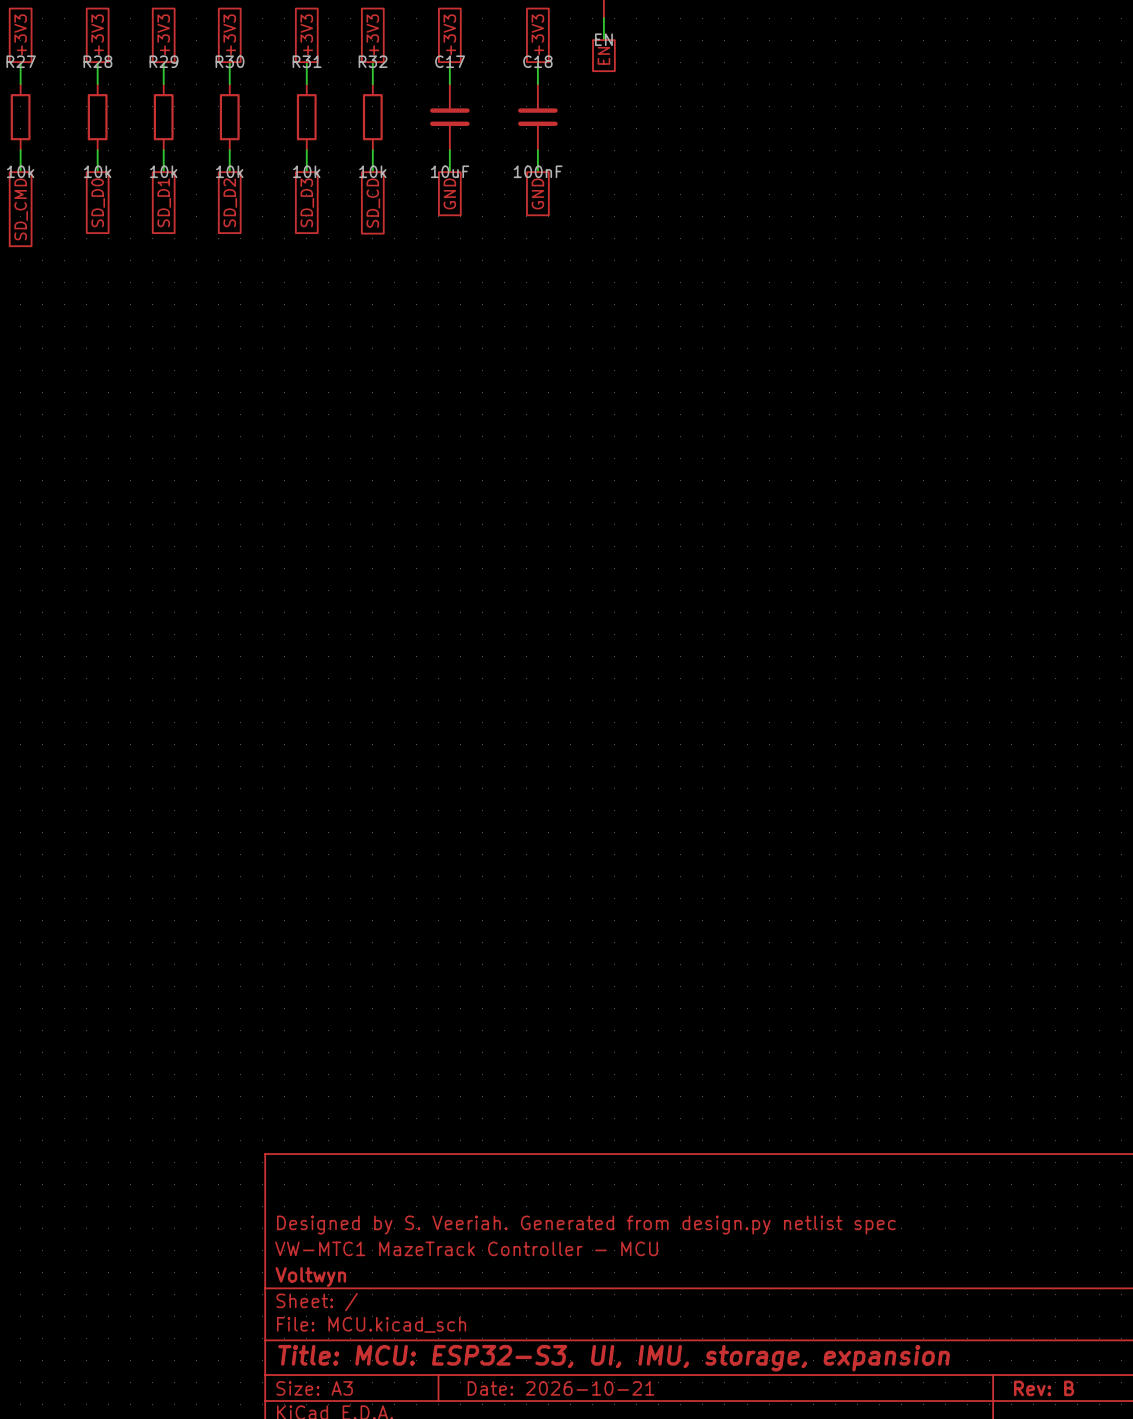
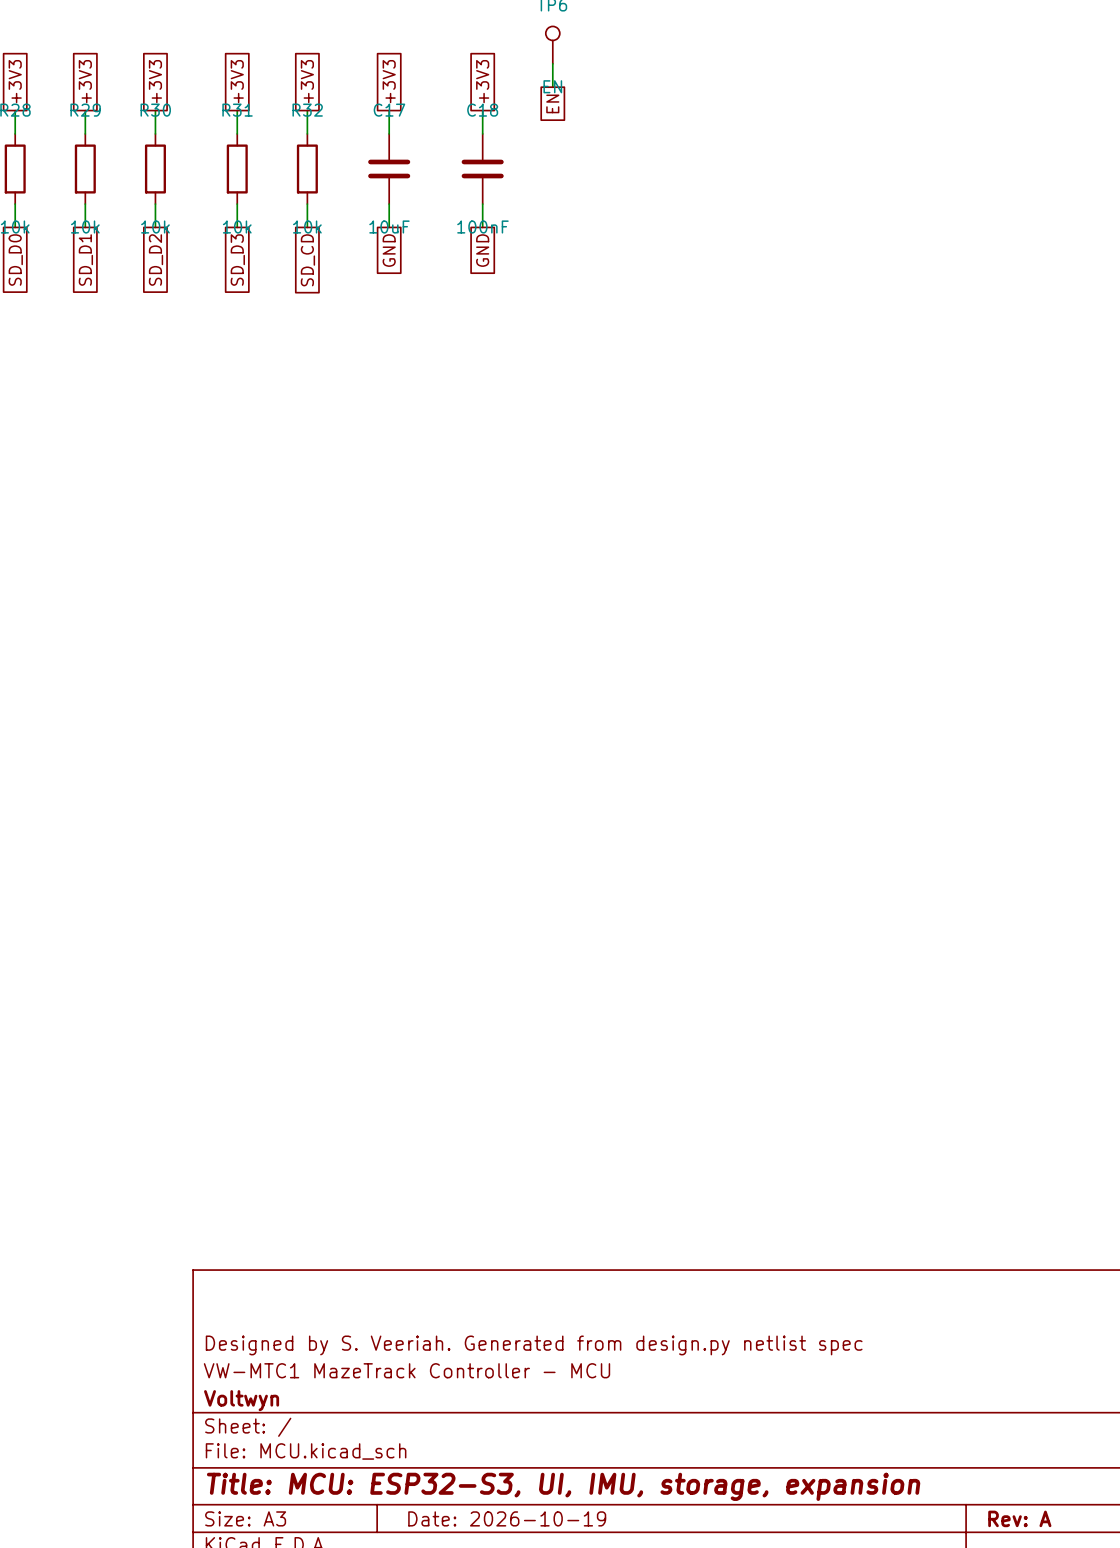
title block: Date: 2026-10-21 (561, 1388) -> Date: 2026-10-19 (507, 1518)
title block: Rev: B (1044, 1388) -> Rev: A (1019, 1518)

